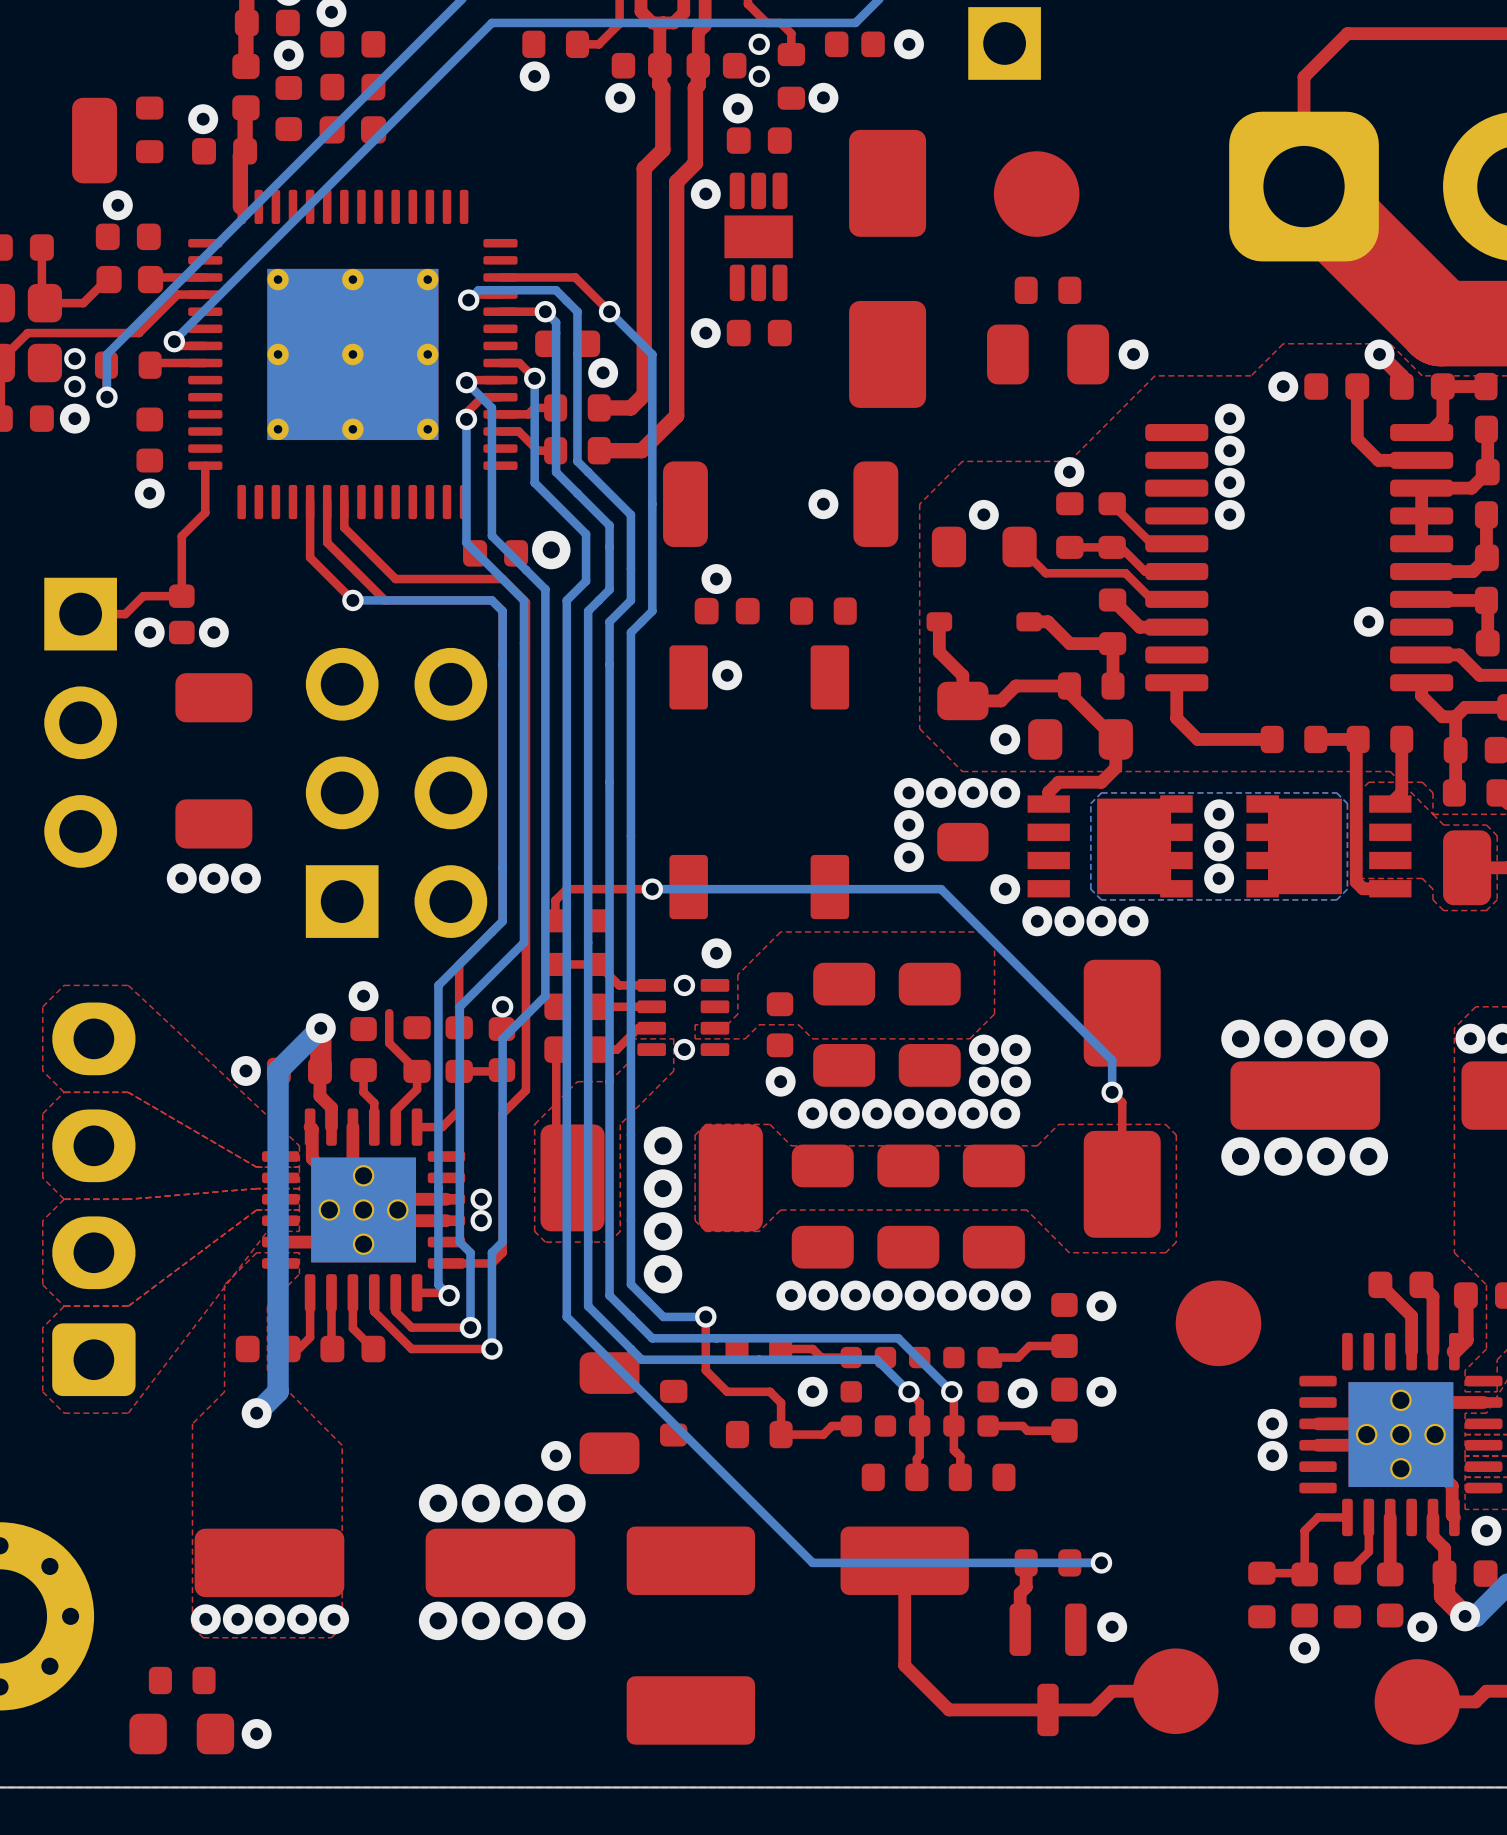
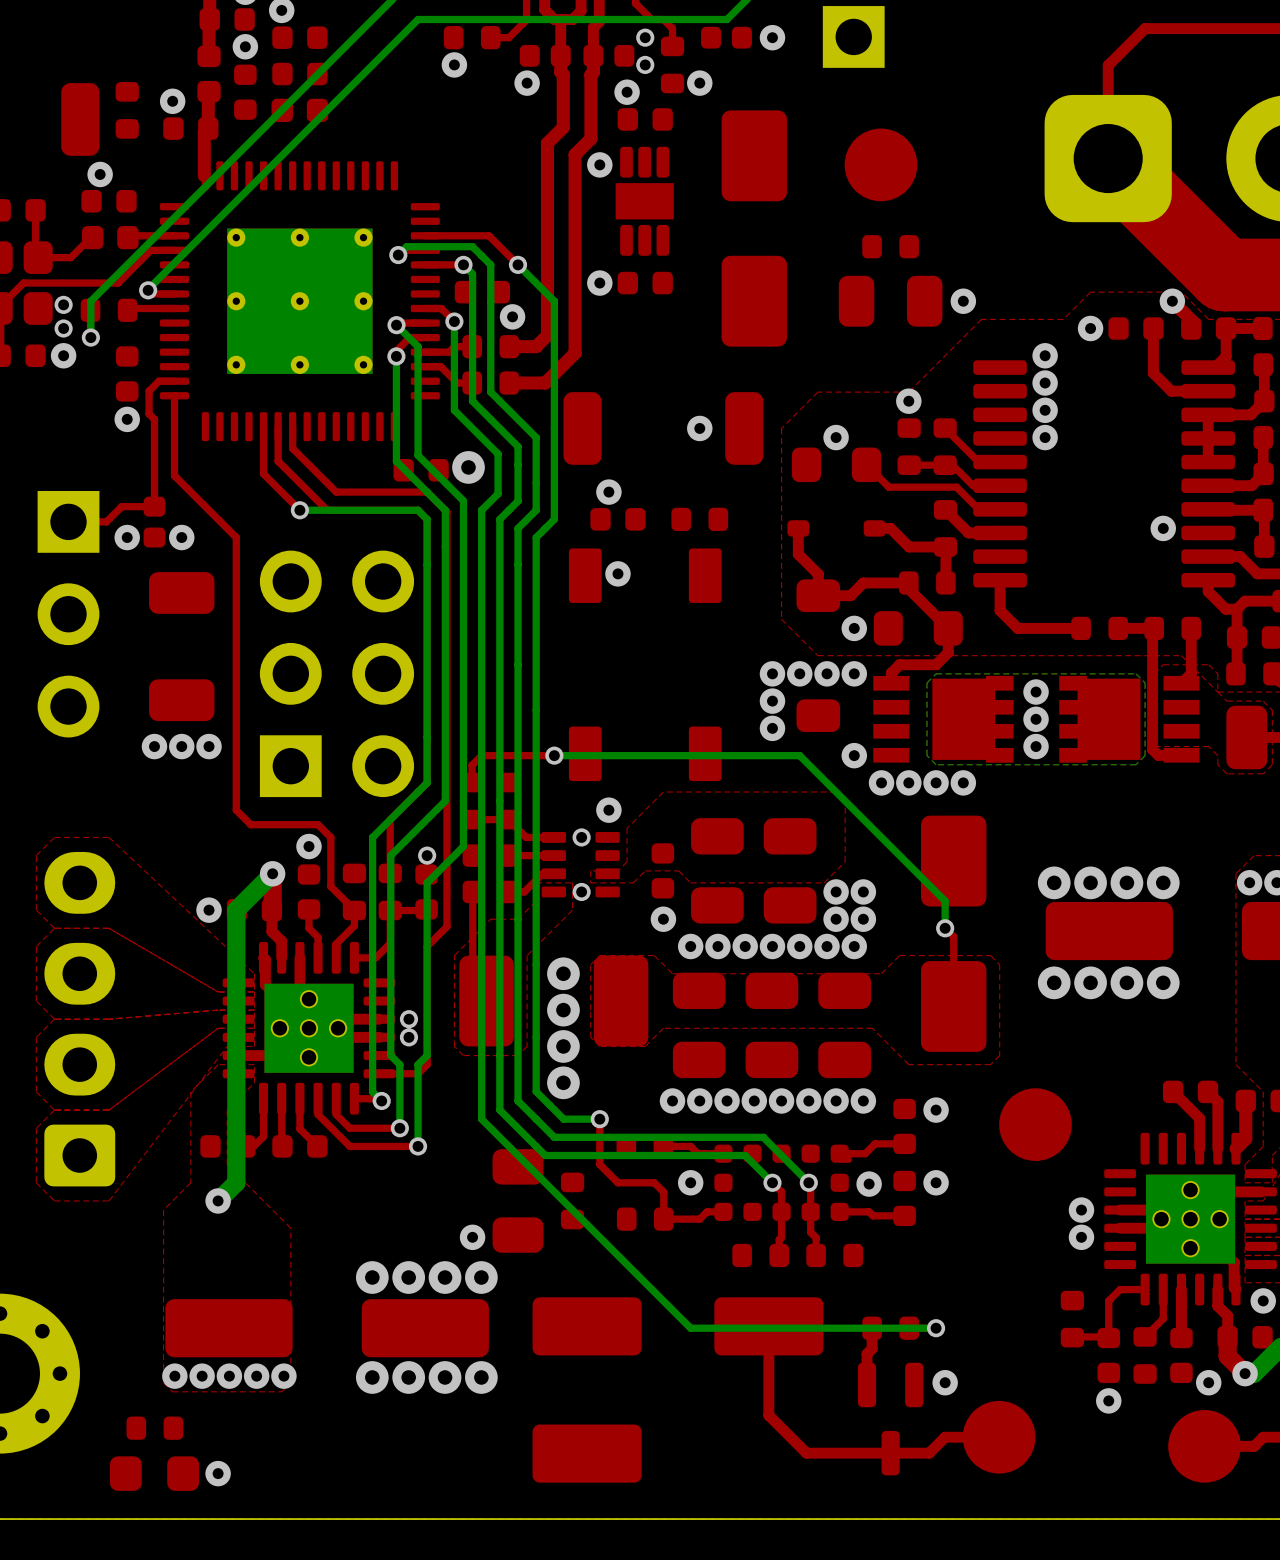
top track: (205, 512) (181, 536) -> (174, 381) (158, 381) (149, 391) (149, 413) (154, 419) (154, 455)
top track: none -> (174, 435) (174, 475) (236, 537) (236, 810) (250, 824) (318, 824) (330, 837) (330, 861)
part position: (1261, 1594) -> (1072, 1319)

